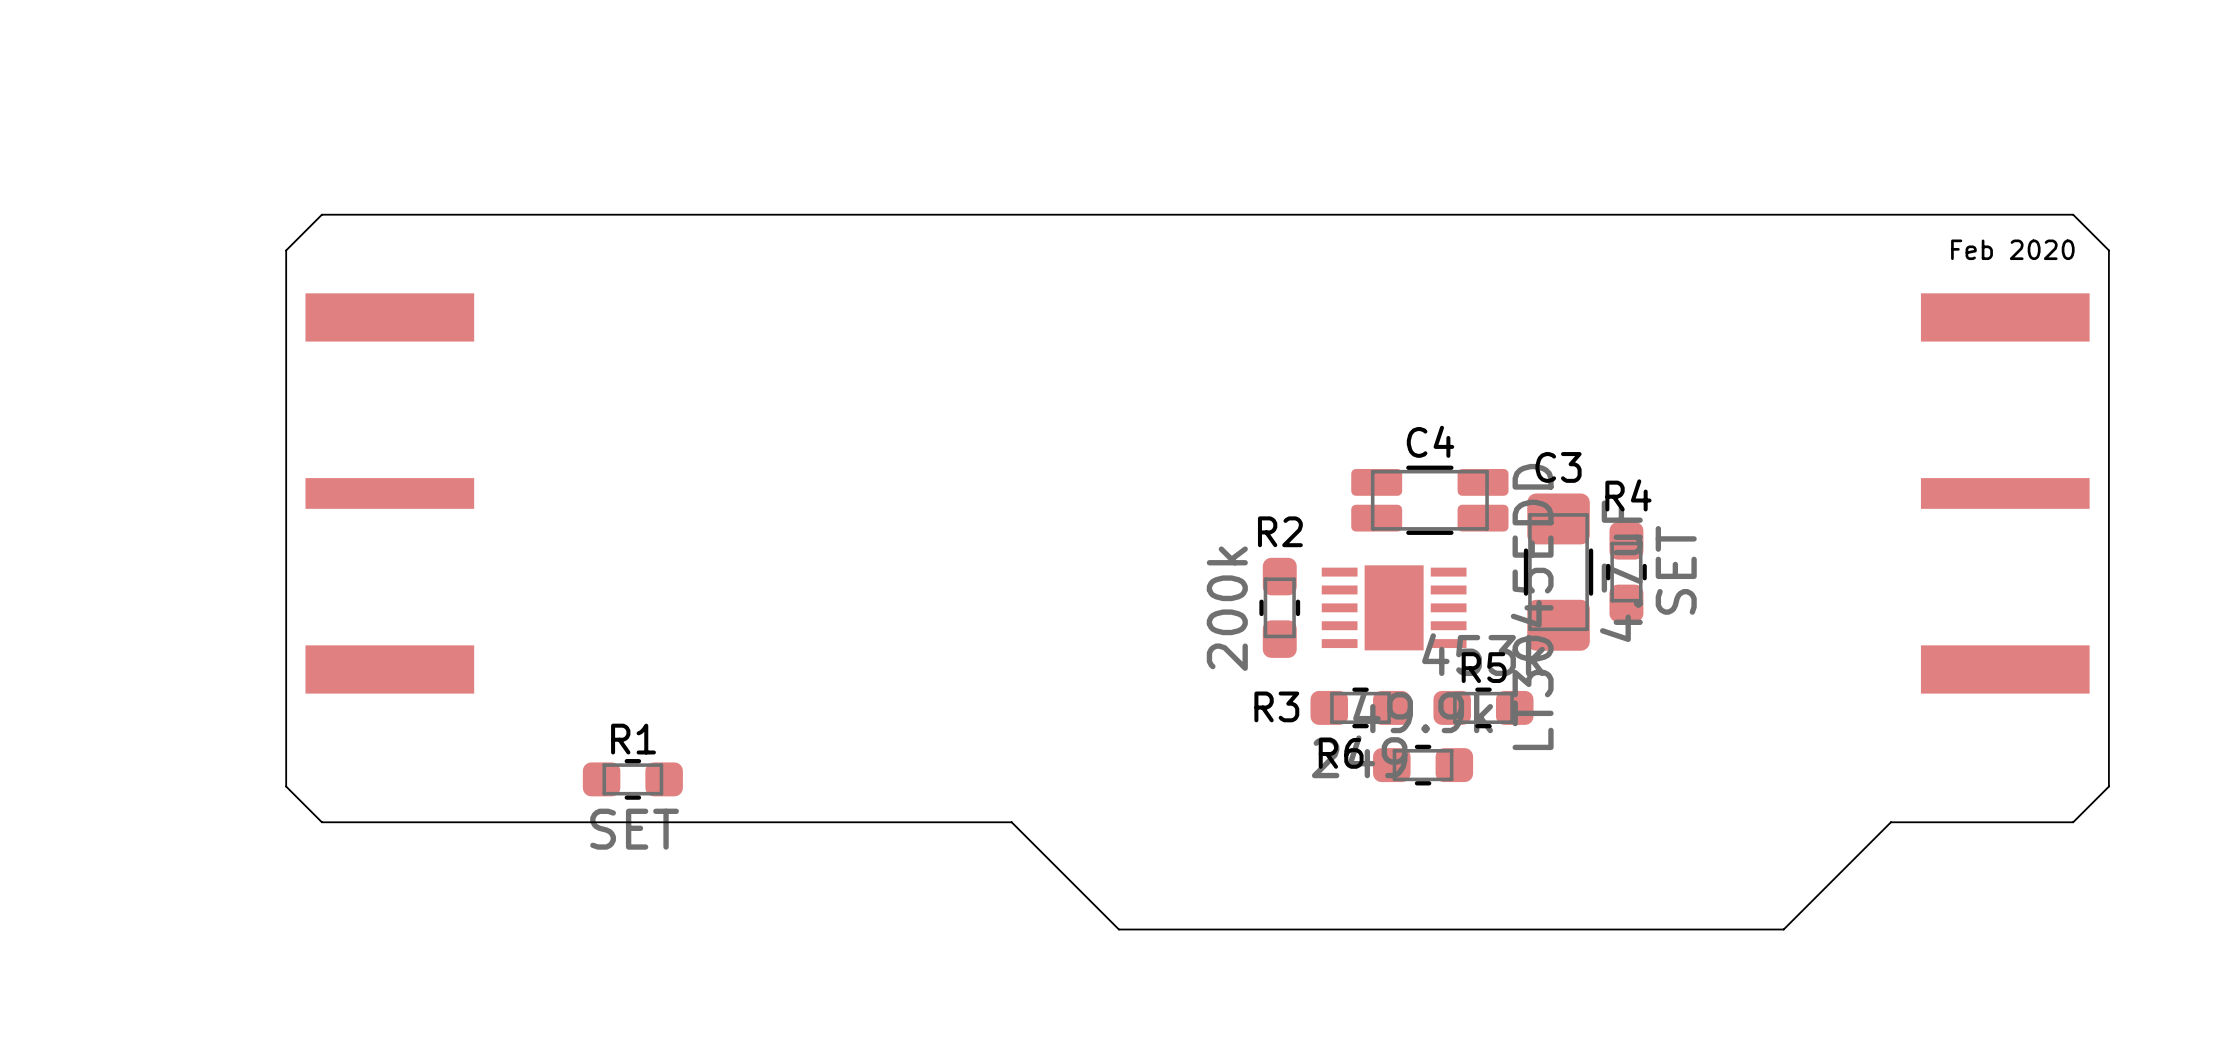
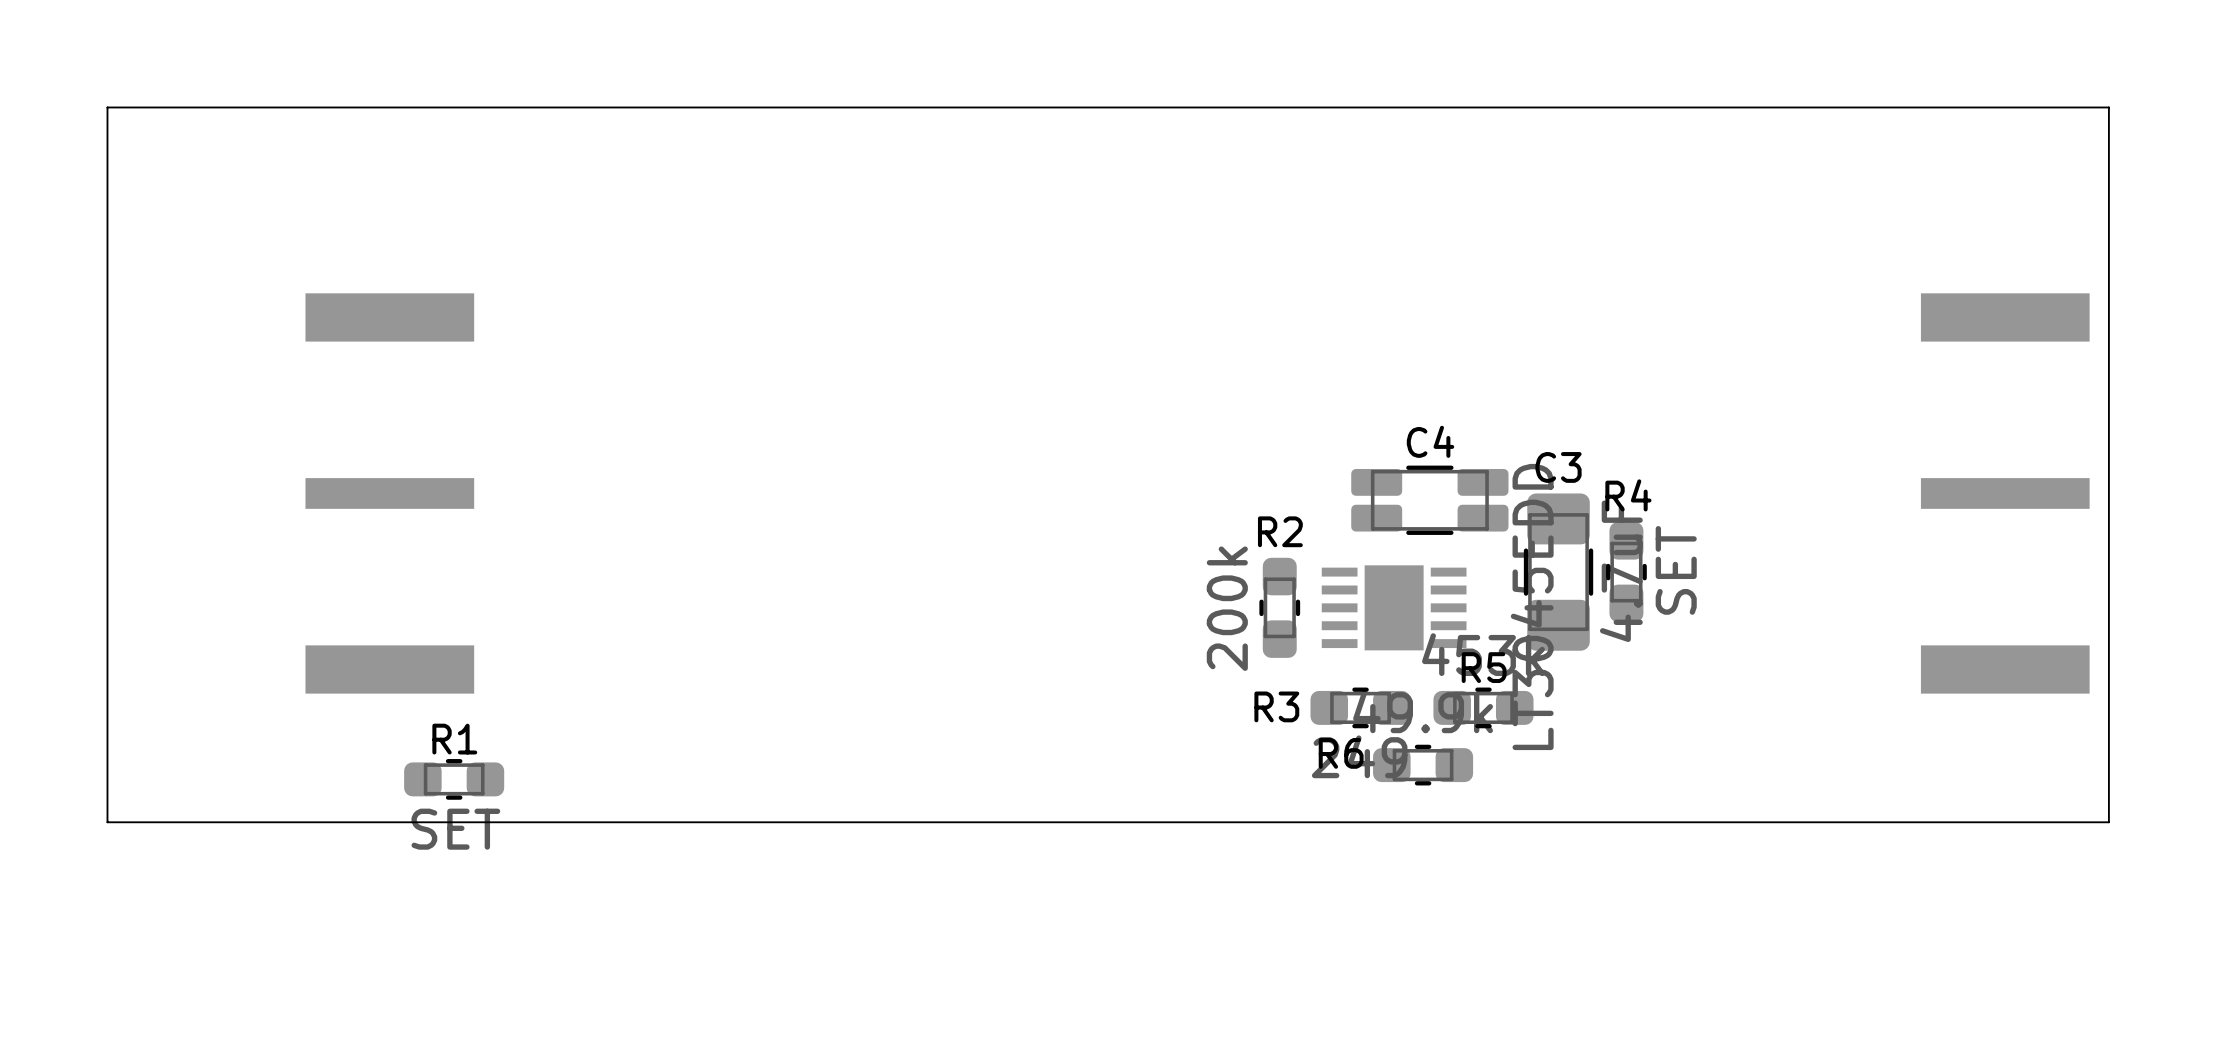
text: Feb 2020 (2012, 249) -> none
board edge: (2108, 250) (2073, 214) (321, 214) (286, 250) (286, 786) (321, 822) -> (2108, 250) (2108, 107) (107, 107) (107, 822) (321, 822)
R1 position: (632, 779) -> (454, 779)
board edge: (2108, 786) (2073, 822) -> (2108, 786) (2108, 822) (2073, 822)
board edge: (1011, 822) (1118, 929) (1783, 929) (1890, 822) -> (1011, 822) (1890, 822)

